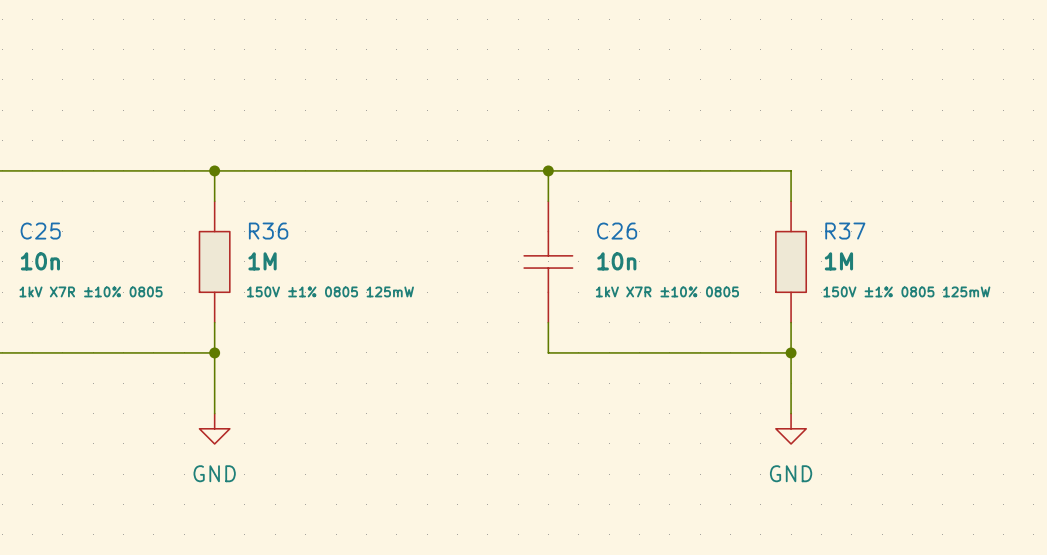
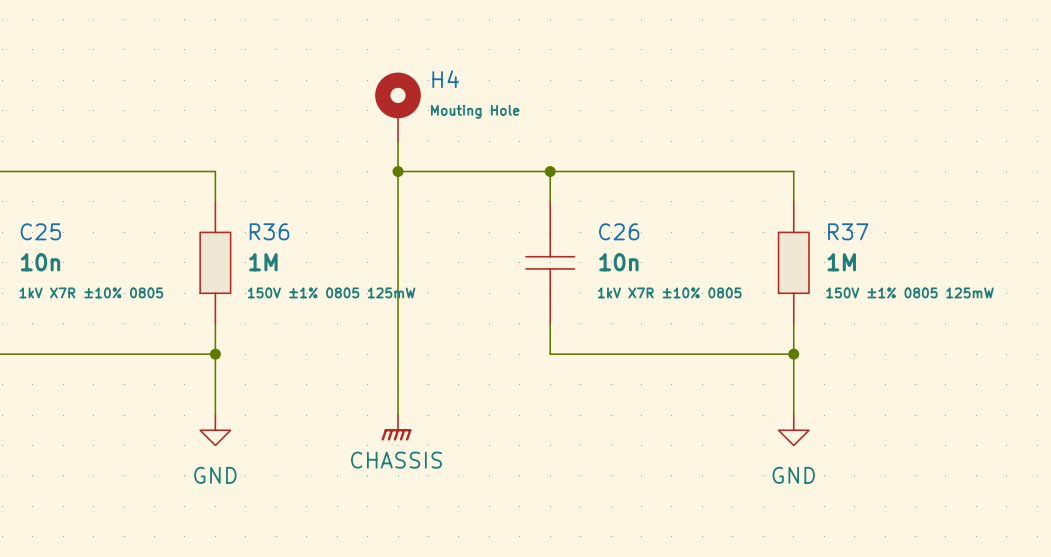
H4: none -> (398, 106)
wire: none -> (398, 141) (398, 415)
wire: (214, 170) (396, 170) -> none
junction: (214, 170) -> none
junction: none -> (398, 171)
power symbol: none -> CHASSIS (396, 427)

